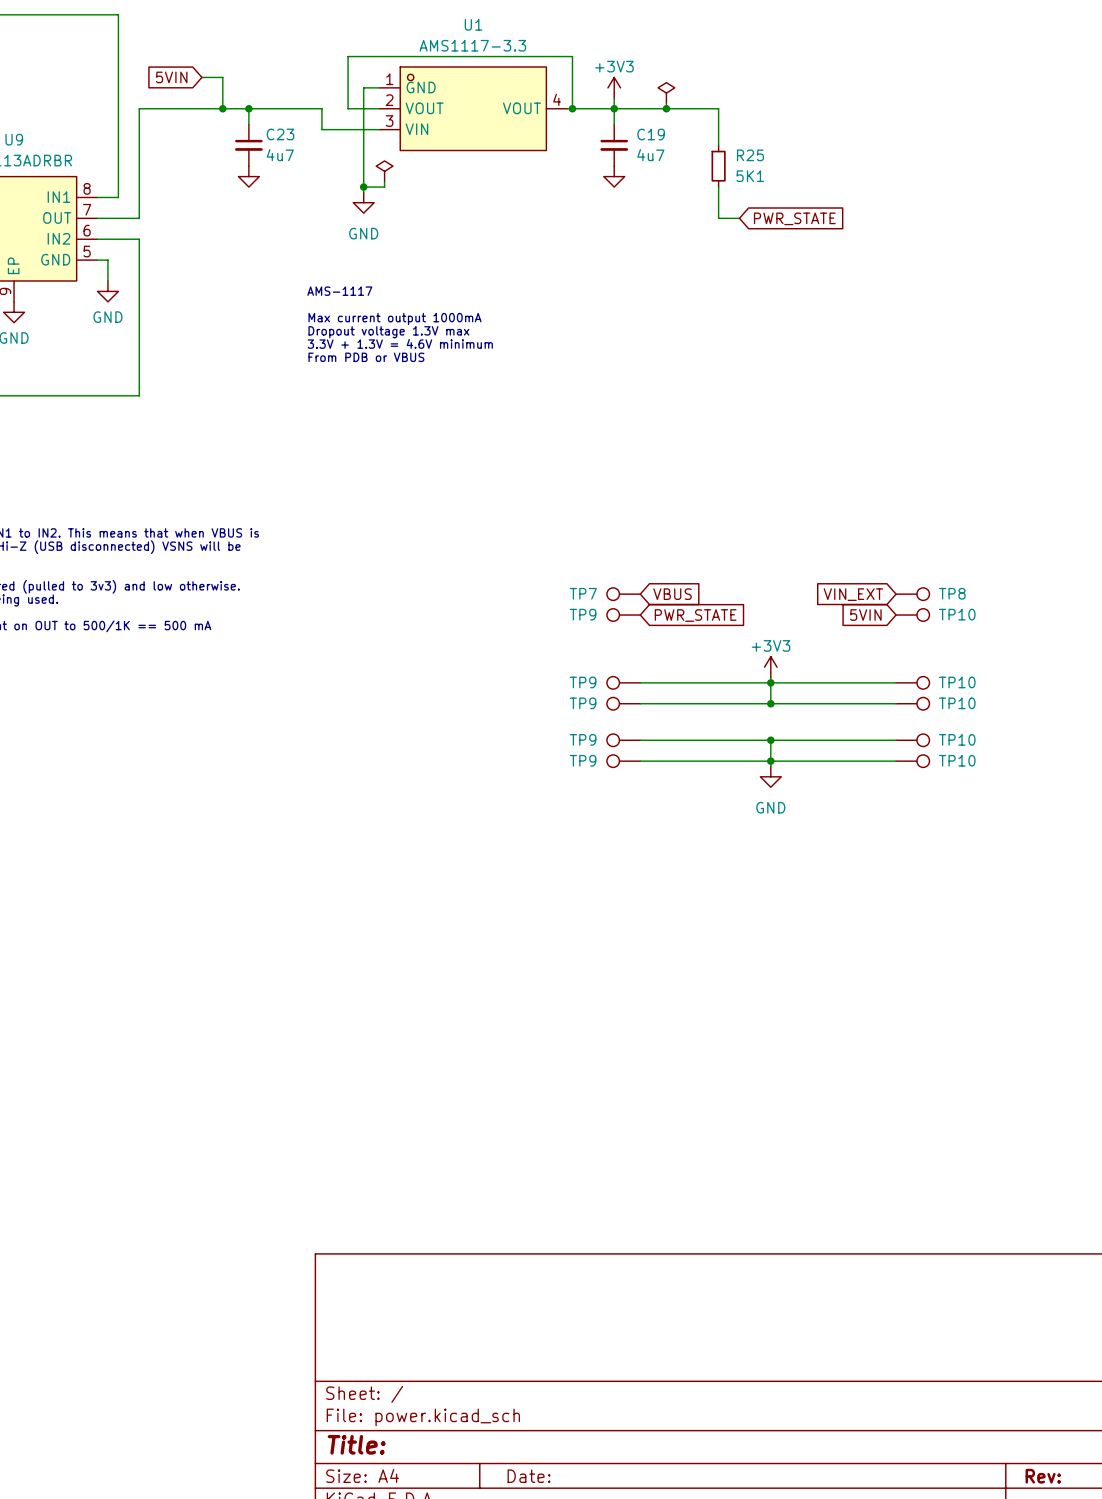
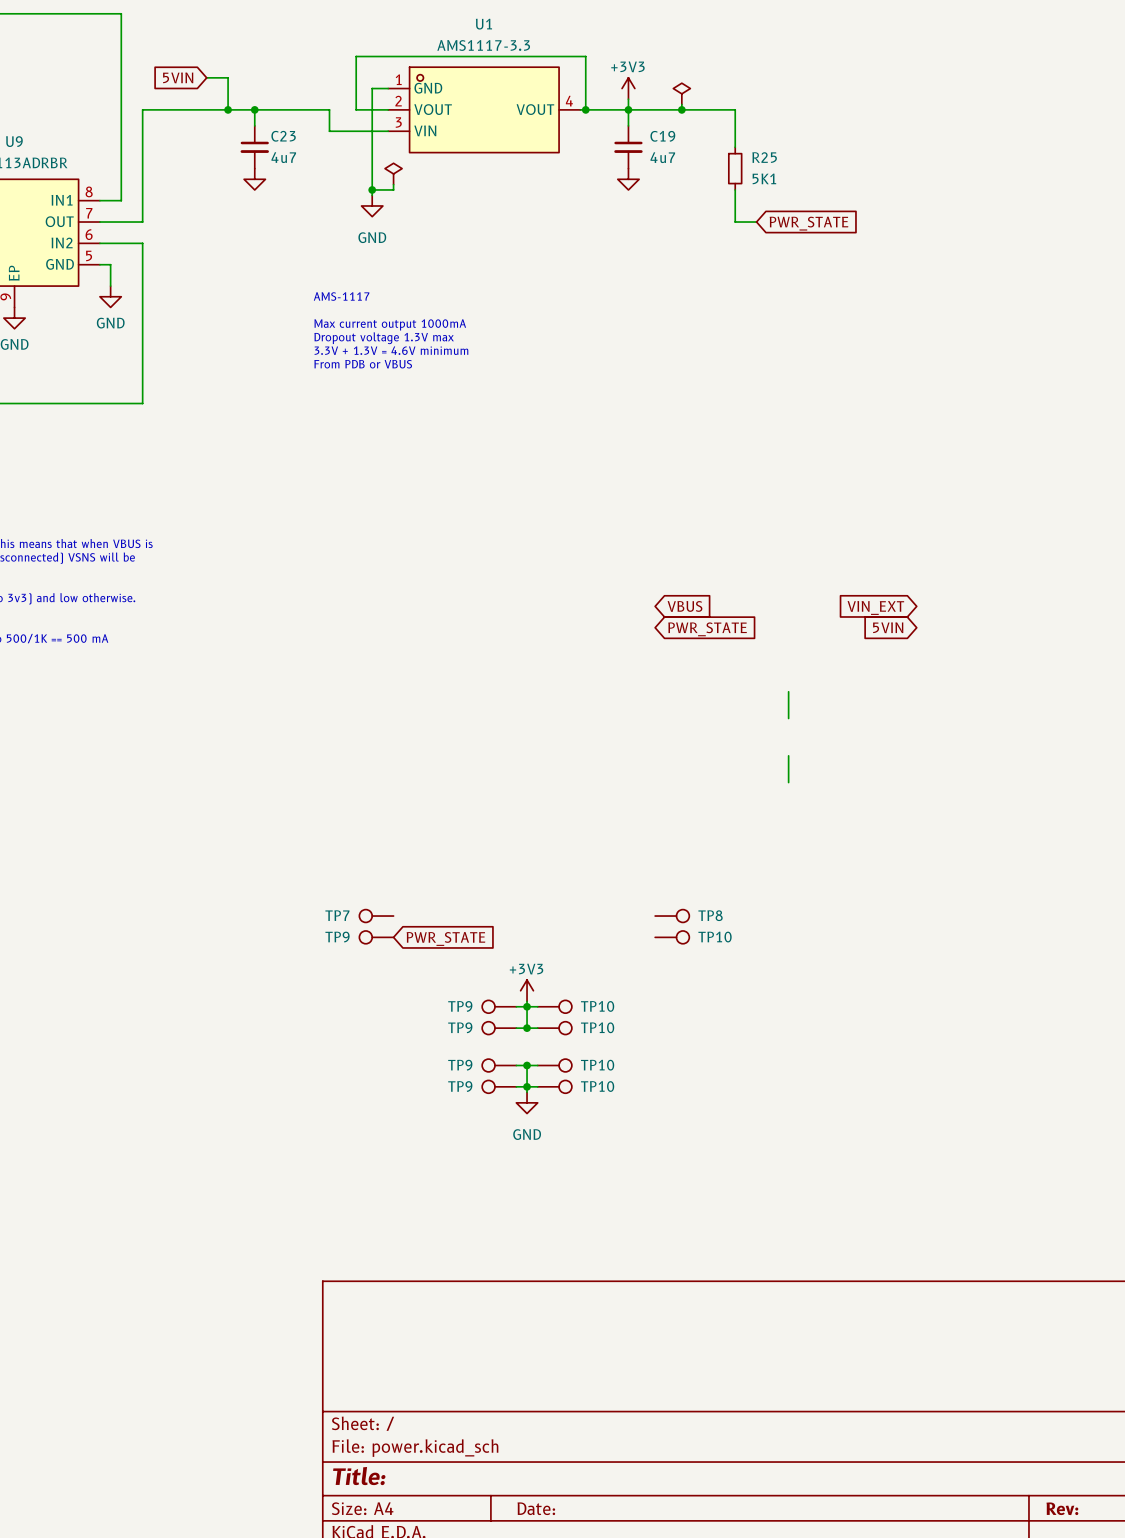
TP7 position: (623, 594) -> (376, 916)
TP8 position: (912, 594) -> (672, 916)
TP9: (623, 615) -> none
TP10: (912, 615) -> none
power symbol: +3V3 (770, 667) -> none
TP9: (623, 682) -> none
wire: (640, 682) (896, 682) -> none
junction: (770, 682) -> none
TP10: (912, 682) -> none
TP9: (623, 703) -> none
wire: (640, 703) (896, 703) -> none
junction: (770, 703) -> none
TP10: (912, 703) -> none
TP9: (623, 740) -> none
wire: (640, 740) (896, 740) -> none
junction: (770, 740) -> none
TP10: (912, 740) -> none
TP9: (623, 761) -> none
wire: (640, 761) (896, 761) -> none
junction: (770, 761) -> none
TP10: (912, 761) -> none
power symbol: GND (770, 776) -> none
TP9: none -> (376, 937)
TP10: none -> (672, 937)
global label: none -> PWR_STATE (445, 938)
power symbol: none -> +3V3 (527, 990)
wire: none -> (527, 1001) (527, 1028)
TP9: none -> (499, 1006)
wire: none -> (516, 1006) (537, 1006)
junction: none -> (527, 1006)
TP10: none -> (554, 1006)
TP9: none -> (499, 1028)
wire: none -> (516, 1028) (537, 1028)
junction: none -> (527, 1028)
TP10: none -> (554, 1028)
TP9: none -> (499, 1065)
wire: none -> (516, 1065) (537, 1065)
wire: none -> (527, 1065) (527, 1092)
junction: none -> (527, 1065)
TP10: none -> (554, 1065)
TP9: none -> (499, 1086)
wire: none -> (516, 1086) (537, 1086)
junction: none -> (527, 1086)
TP10: none -> (554, 1086)
power symbol: none -> GND (527, 1102)

